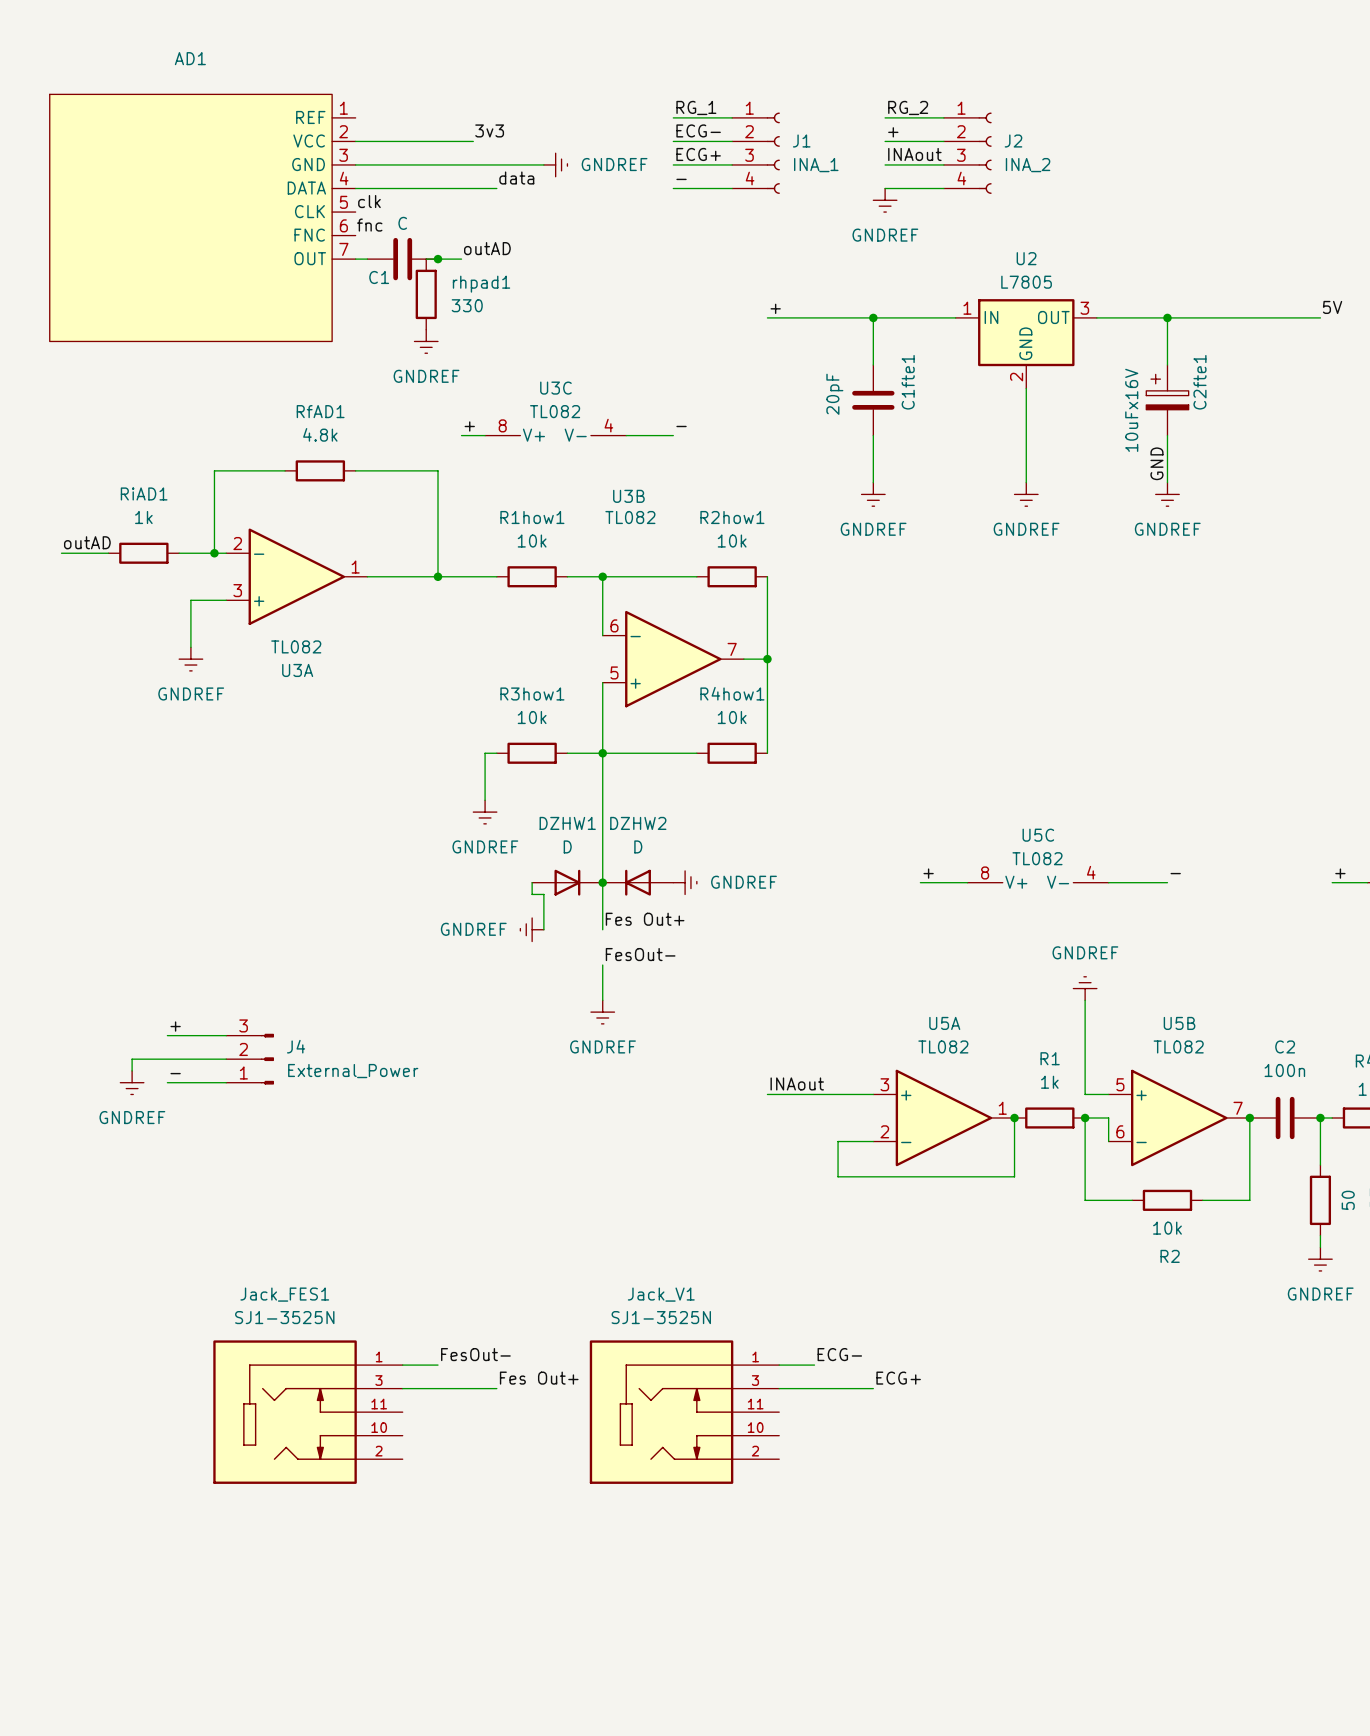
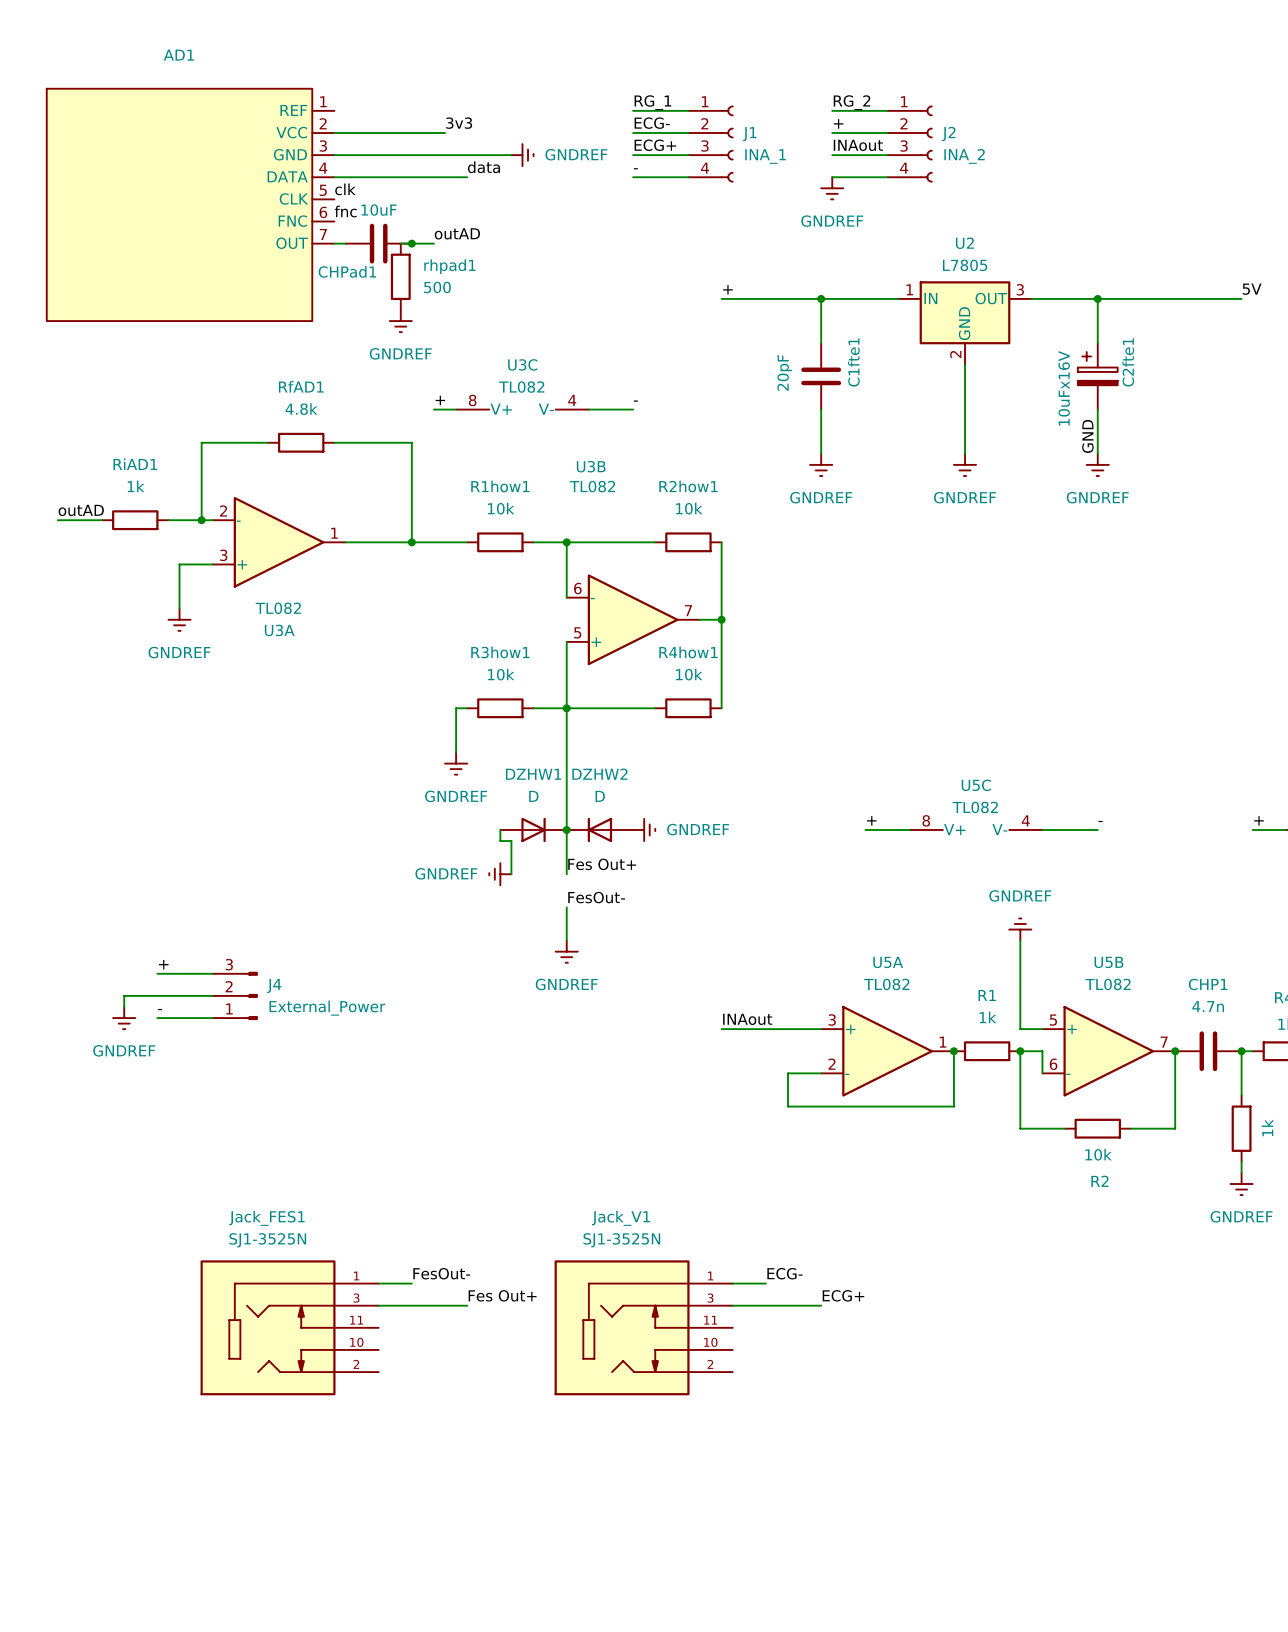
C1 value: C (402, 223) -> 10uF (379, 210)
C1 name: C1 (379, 277) -> CHPad1 (347, 271)
rhpad1 value: 330 (467, 305) -> 500 (437, 287)
C2 name: C2 (1285, 1046) -> CHP1 (1208, 984)
C2 value: 100n (1284, 1070) -> 4.7n (1208, 1006)
part value: 50 (1348, 1200) -> 1k (1267, 1127)

